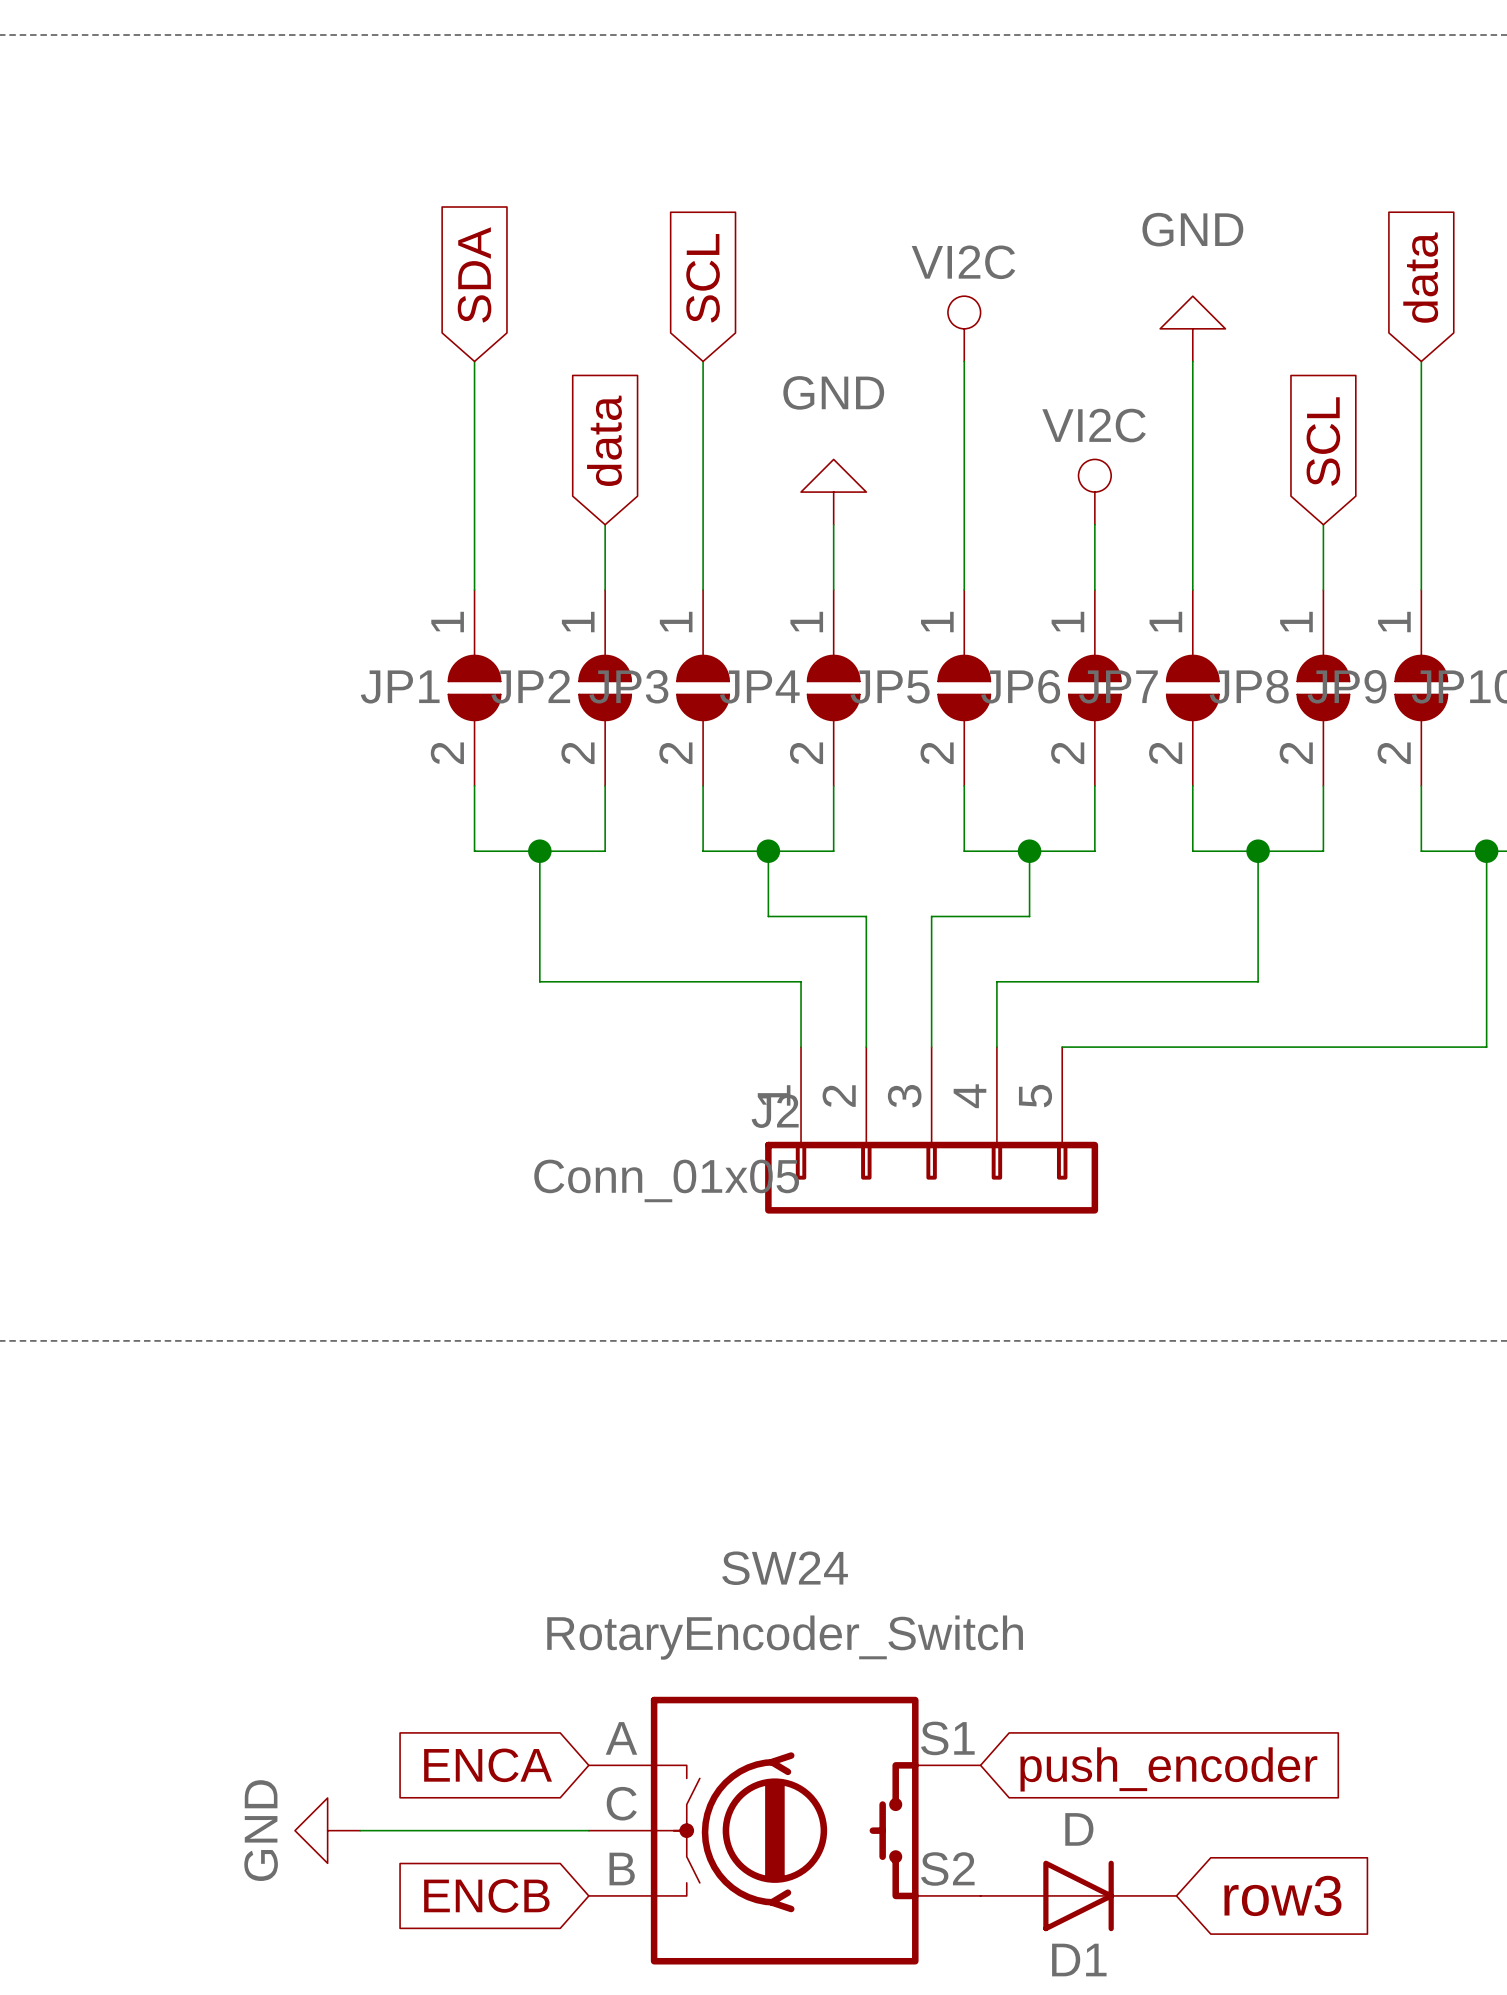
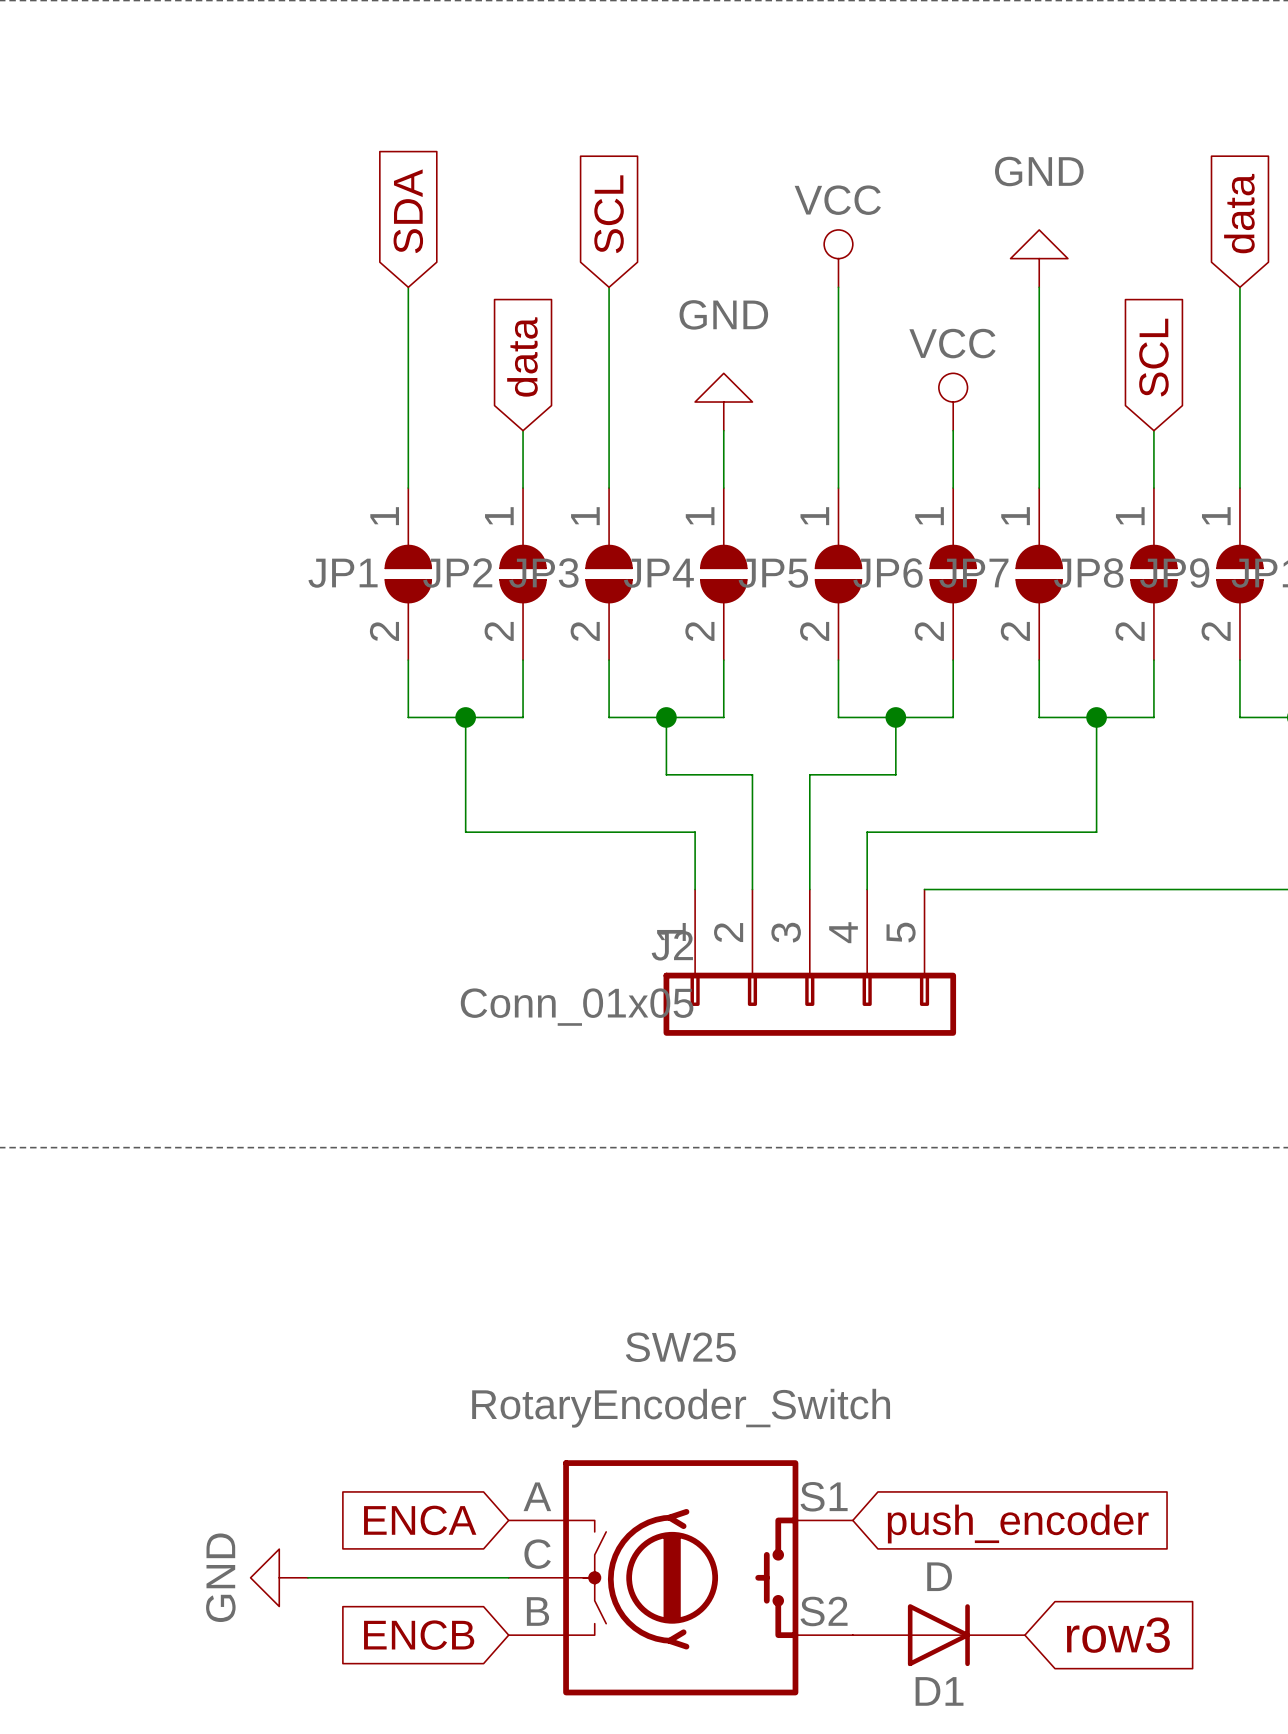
power symbol: VI2C (964, 328) -> VCC (838, 258)
power symbol: VI2C (1094, 492) -> VCC (953, 402)
SW24 name: SW24 (785, 1568) -> SW25 (680, 1347)

